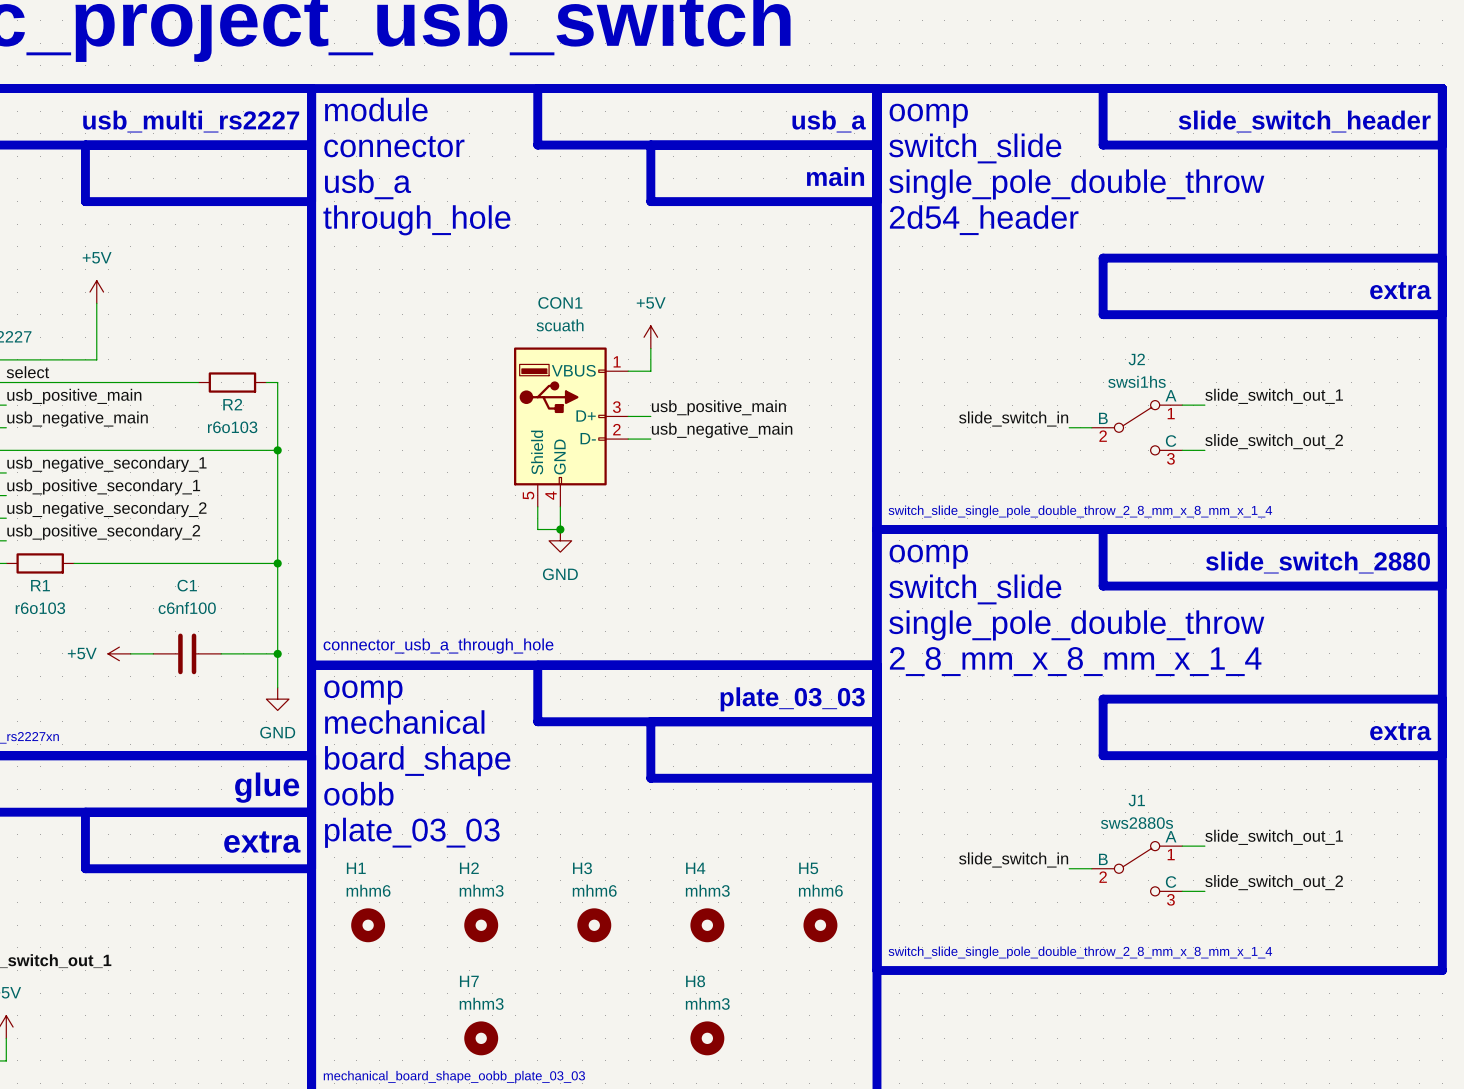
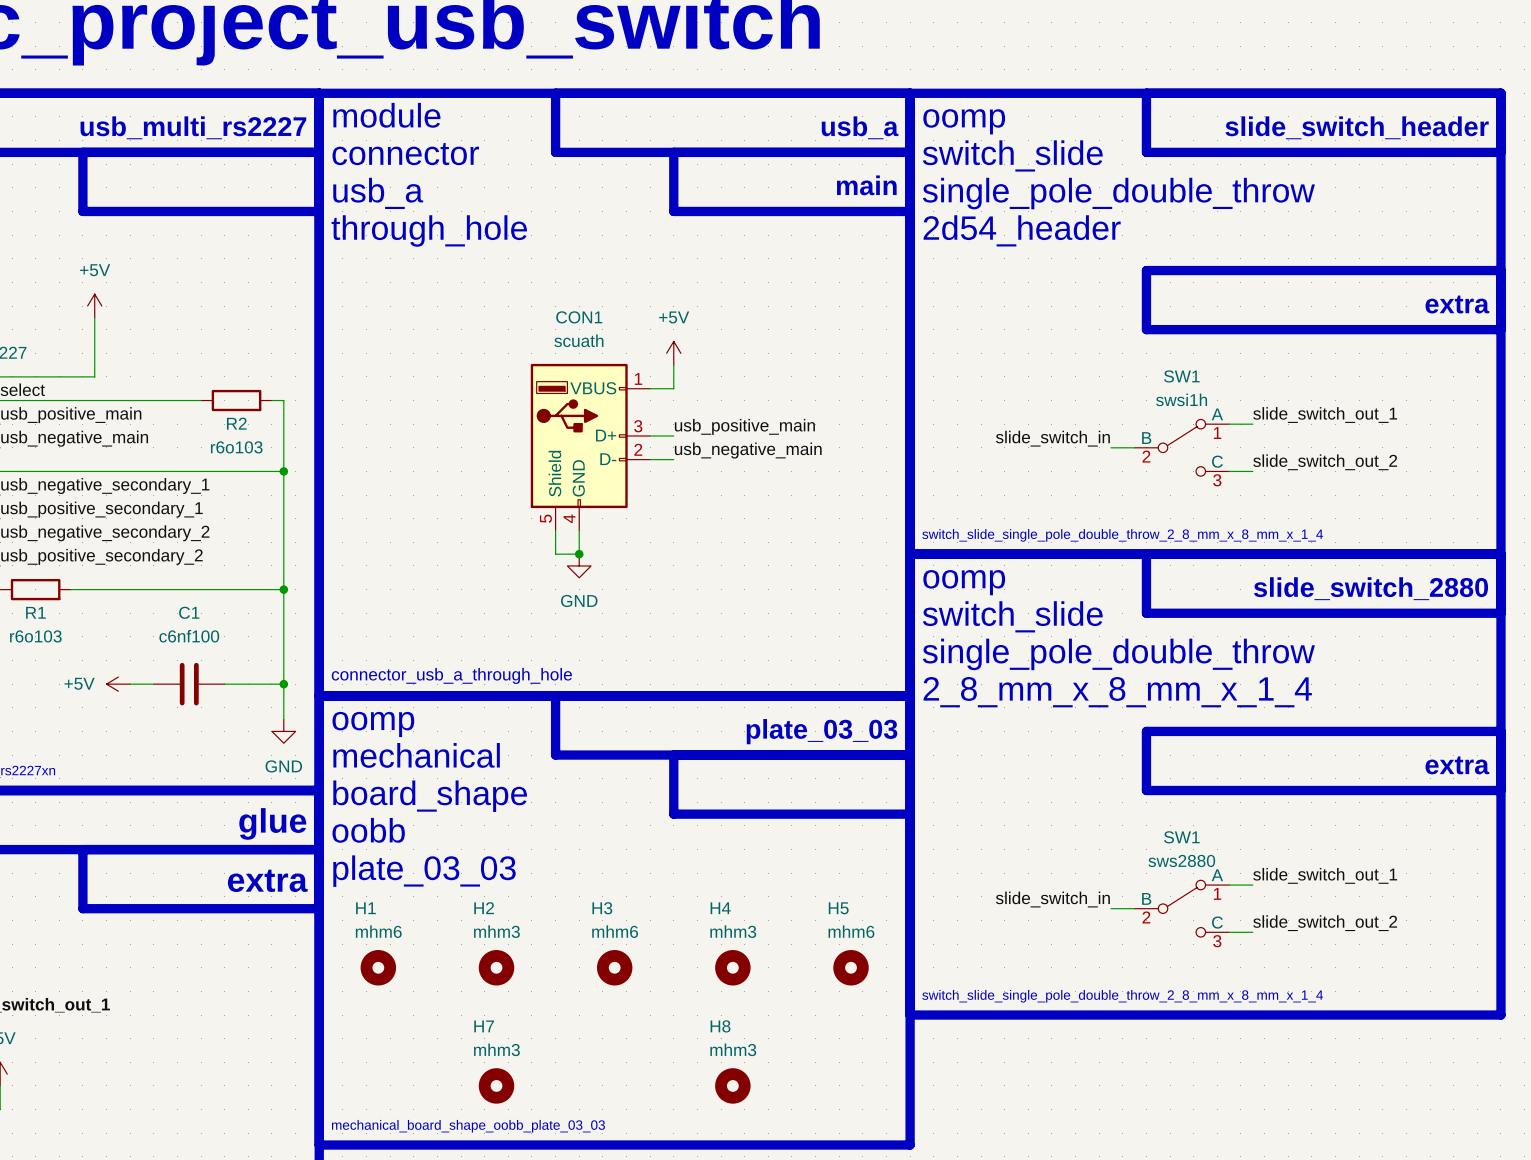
J2 name: J2 (1136, 359) -> SW1 (1181, 376)
J2 value: swsi1hs (1136, 381) -> swsi1h (1181, 399)
J1 name: J1 (1136, 800) -> SW1 (1181, 837)
J1 value: sws2880s (1136, 823) -> sws2880 (1181, 860)

